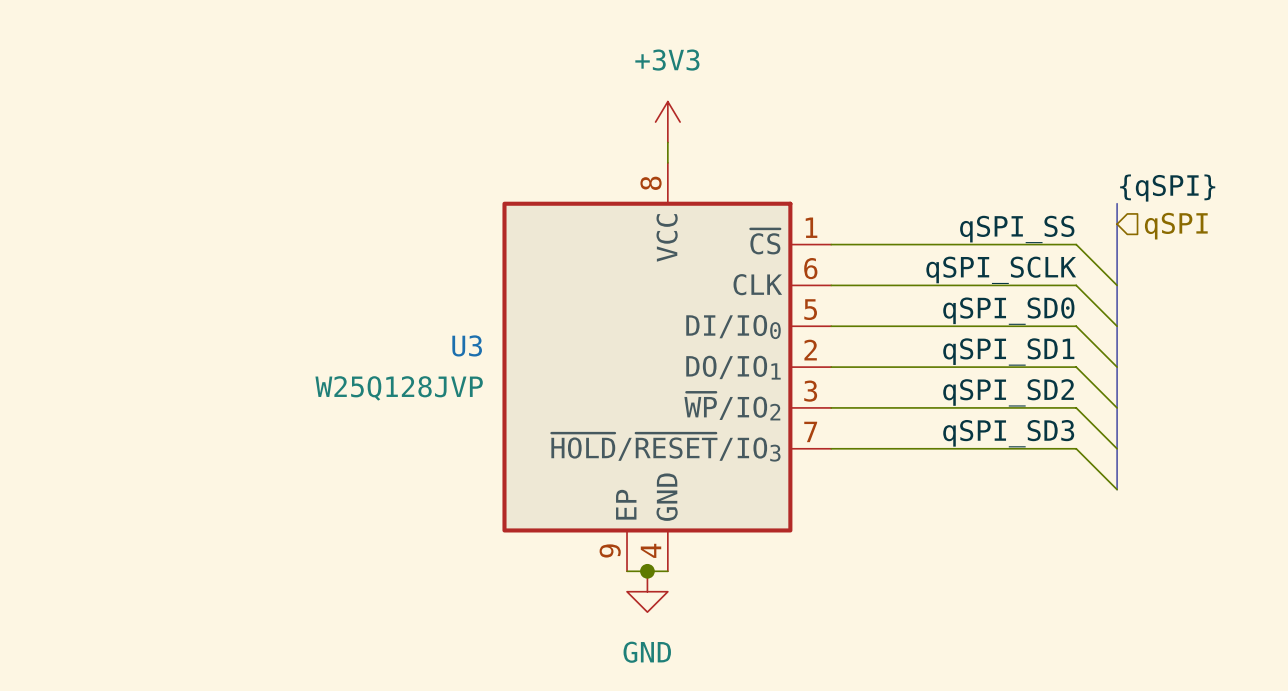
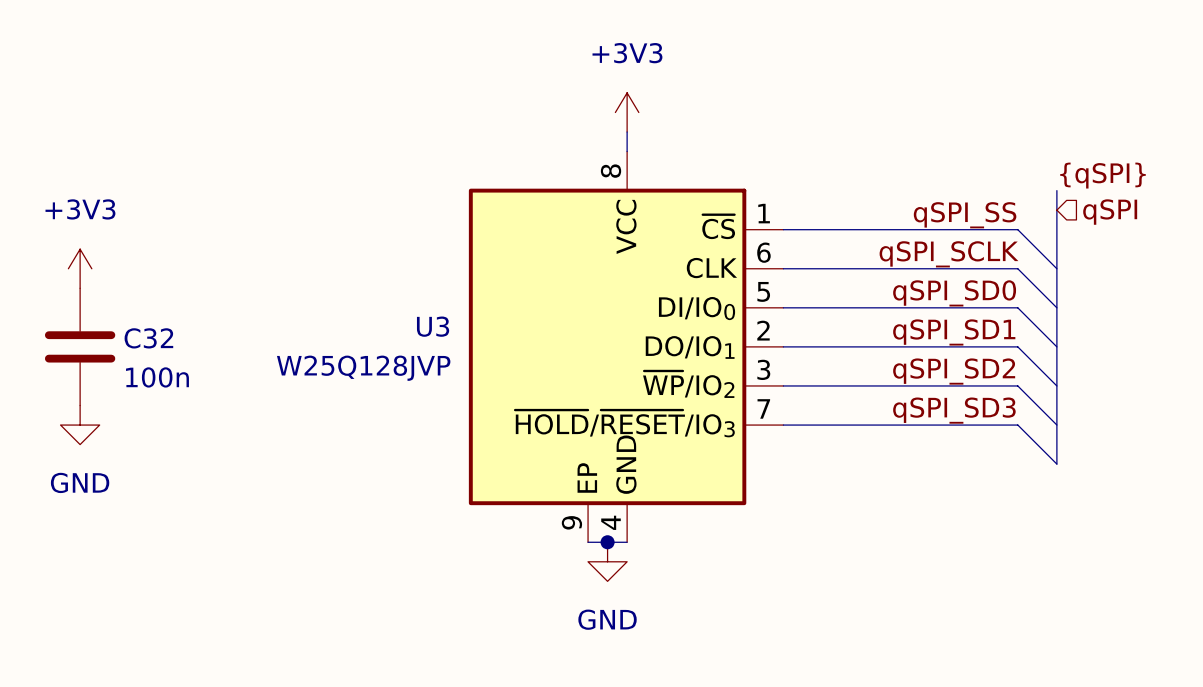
power symbol: none -> +3V3 (80, 268)
C32: none -> 100n (80, 346)
power symbol: none -> GND (80, 425)

